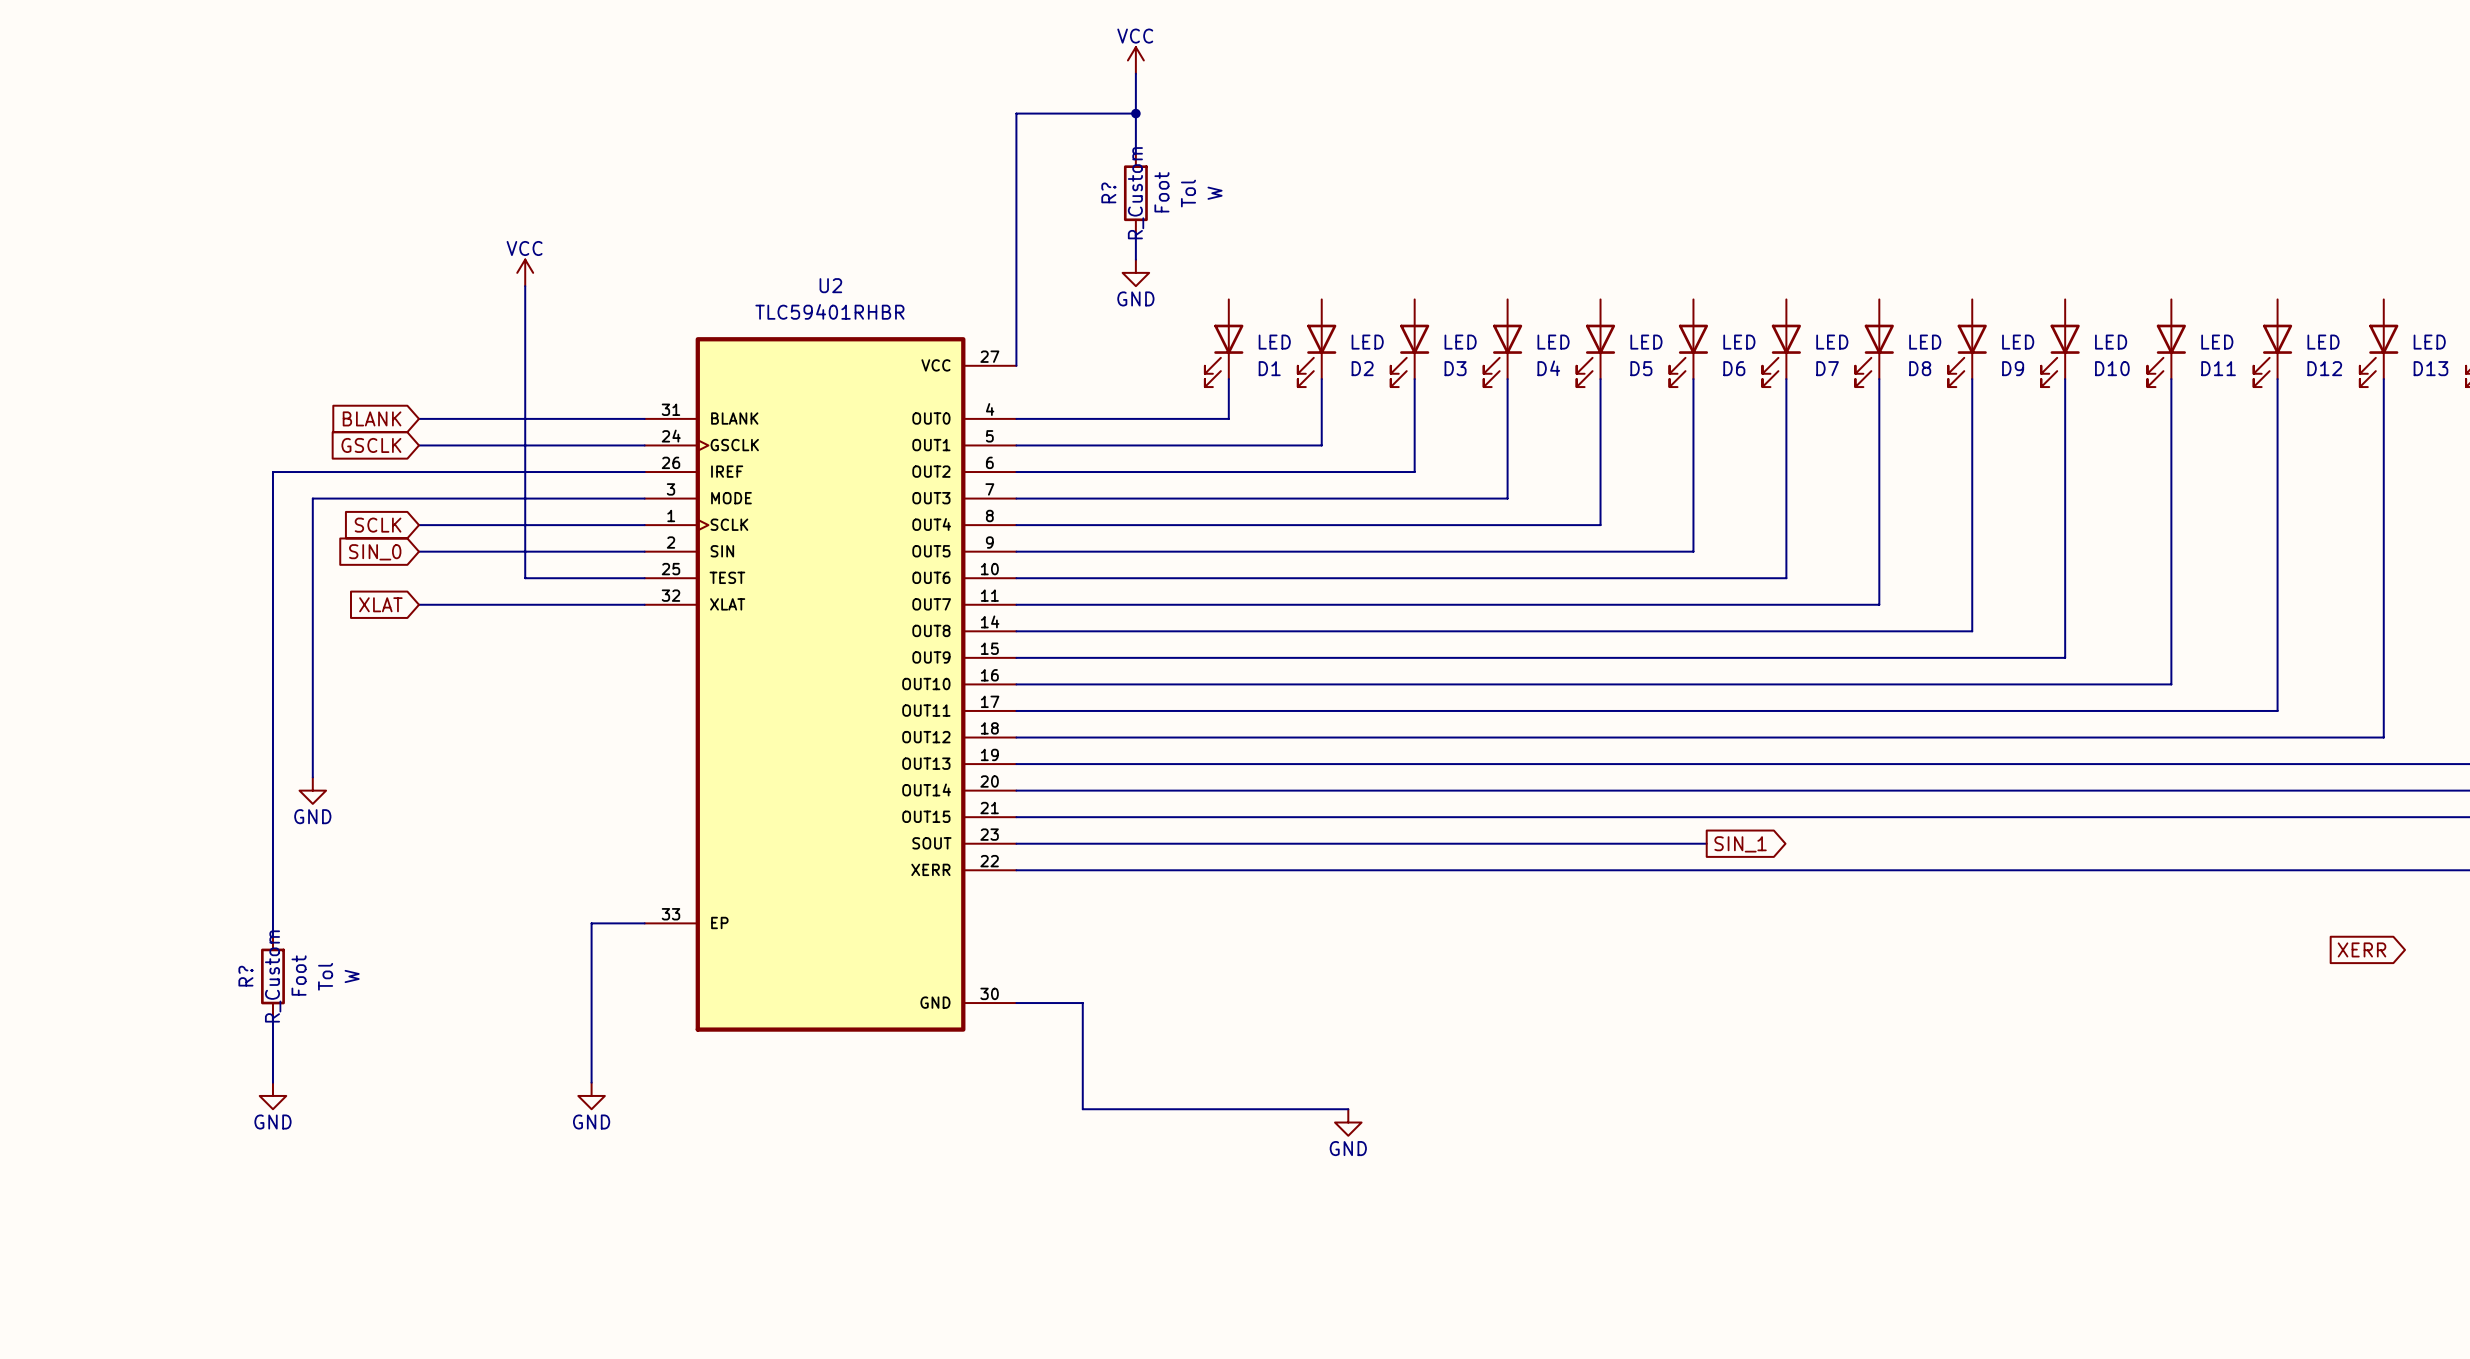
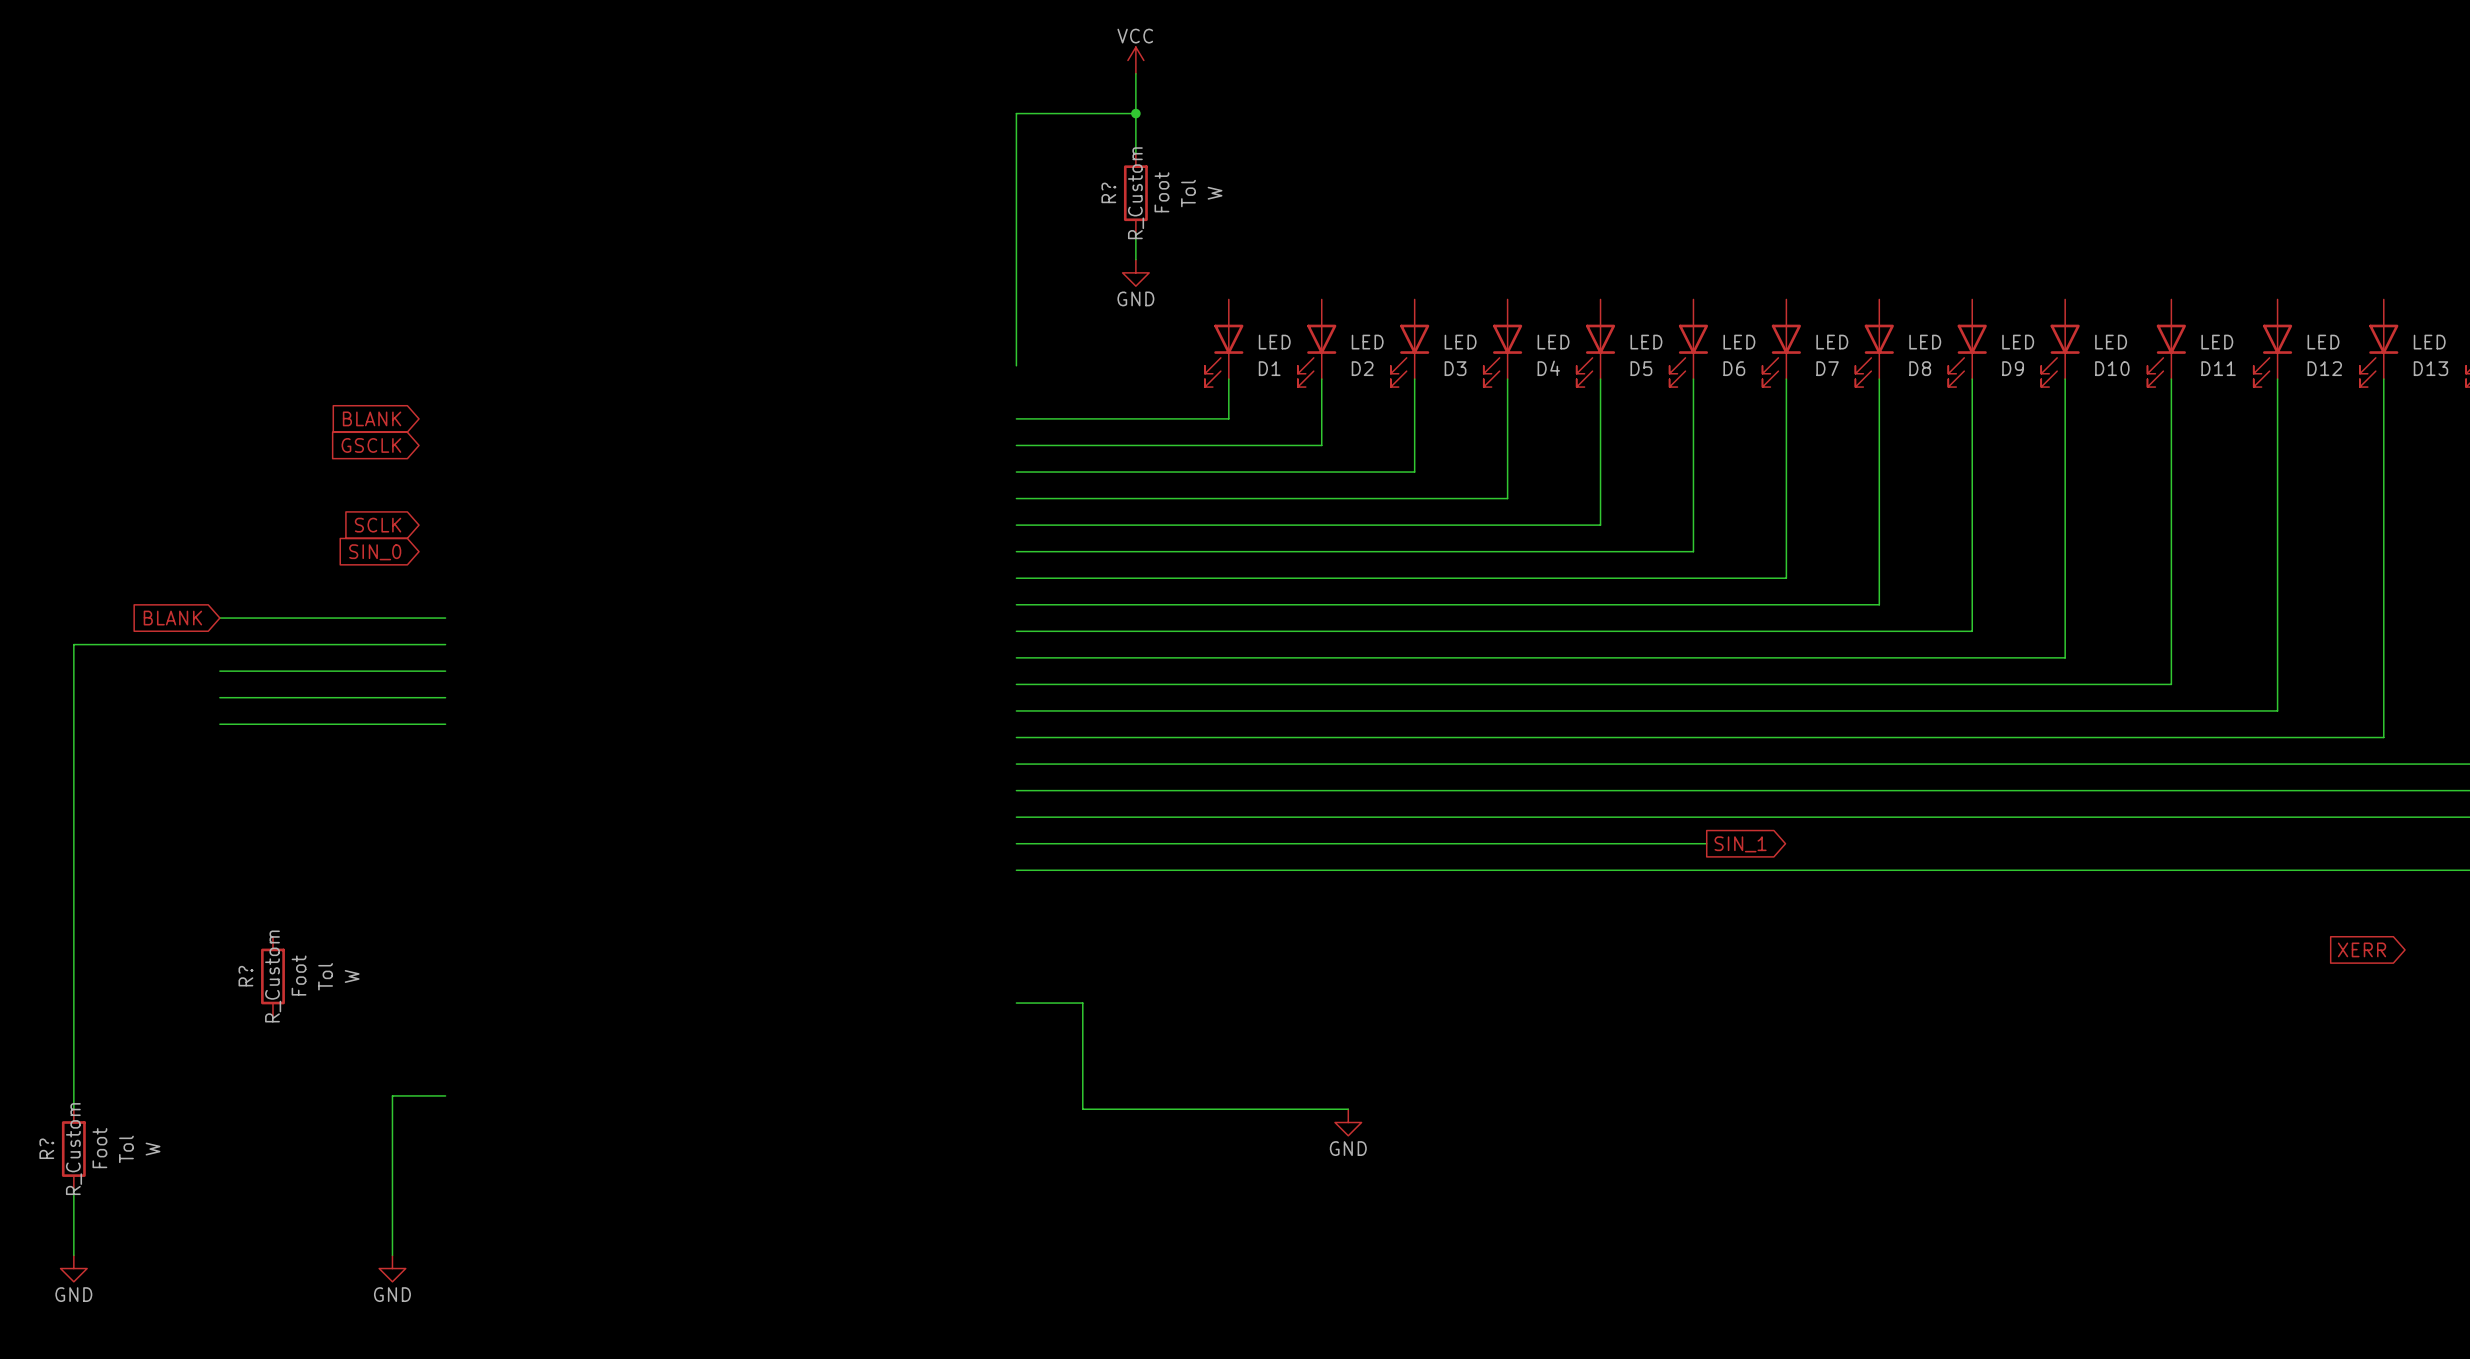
power symbol: VCC (525, 272) -> none
wire: (525, 286) (525, 578) (644, 578) -> none
wire: (419, 418) (644, 418) -> none
wire: (419, 445) (644, 445) -> none
wire: (644, 472) (272, 472) (272, 936) -> none
wire: (644, 498) (312, 498) (312, 777) -> none
wire: (419, 525) (644, 525) -> none
wire: (419, 551) (644, 551) -> (219, 618) (445, 618)
global label: XLAT (380, 604) -> none
wire: (419, 604) (644, 604) -> (219, 671) (445, 671)
global label: none -> BLANK (172, 618)
wire: none -> (445, 644) (73, 644) (73, 1109)
U2: TLC59401RHBR (830, 684) -> none
wire: none -> (219, 697) (445, 697)
wire: none -> (219, 724) (445, 724)
power symbol: GND (312, 790) -> none
wire: (644, 923) (591, 923) (591, 1082) -> none
wire: (272, 1016) (272, 1082) -> none
power symbol: GND (272, 1095) -> none
wire: none -> (445, 1095) (392, 1095) (392, 1255)
power symbol: GND (591, 1095) -> none
R?: none -> R_Custom (73, 1149)
wire: none -> (73, 1188) (73, 1255)
power symbol: none -> GND (73, 1268)
power symbol: none -> GND (392, 1268)

